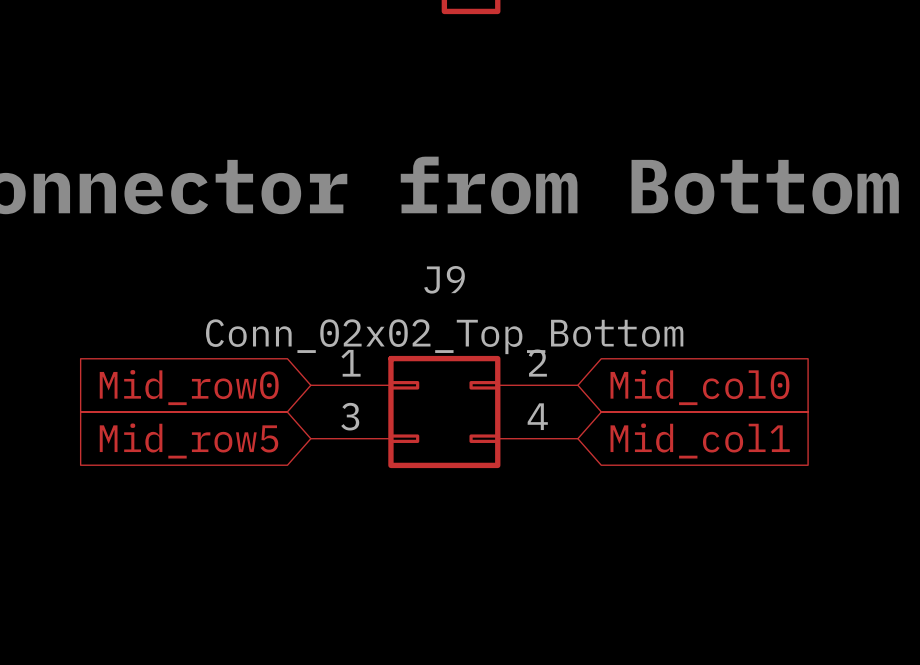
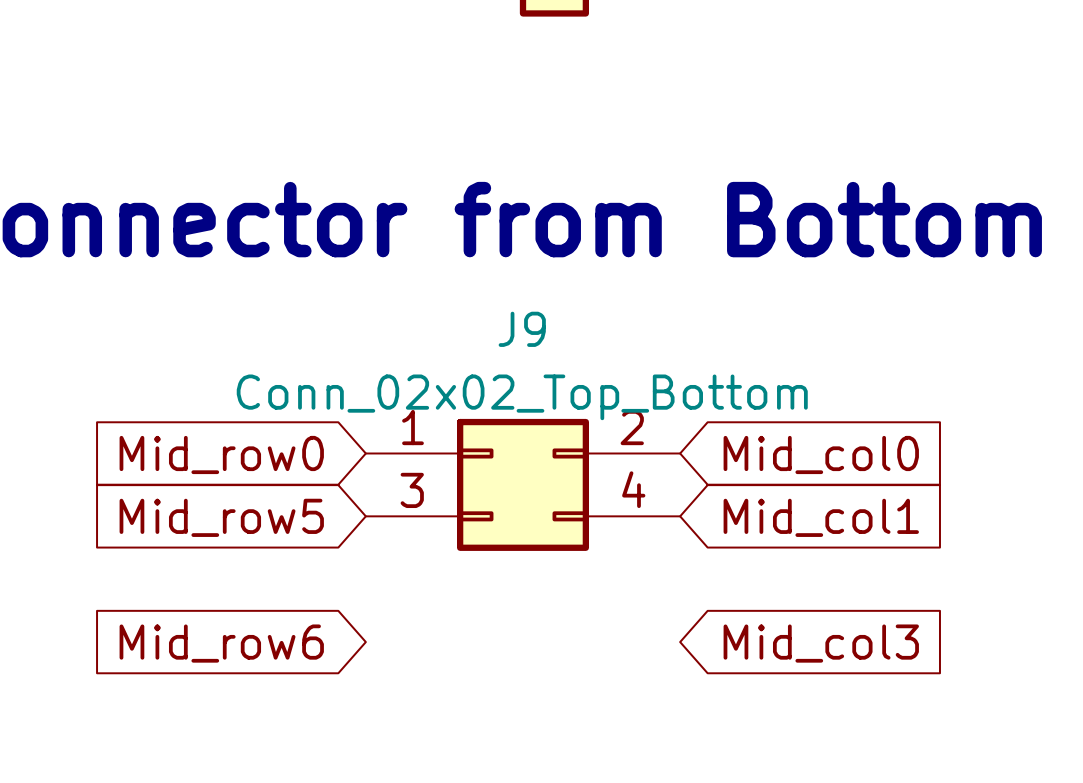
global label: none -> Mid_row6 (221, 643)
global label: none -> Mid_col3 (821, 643)

